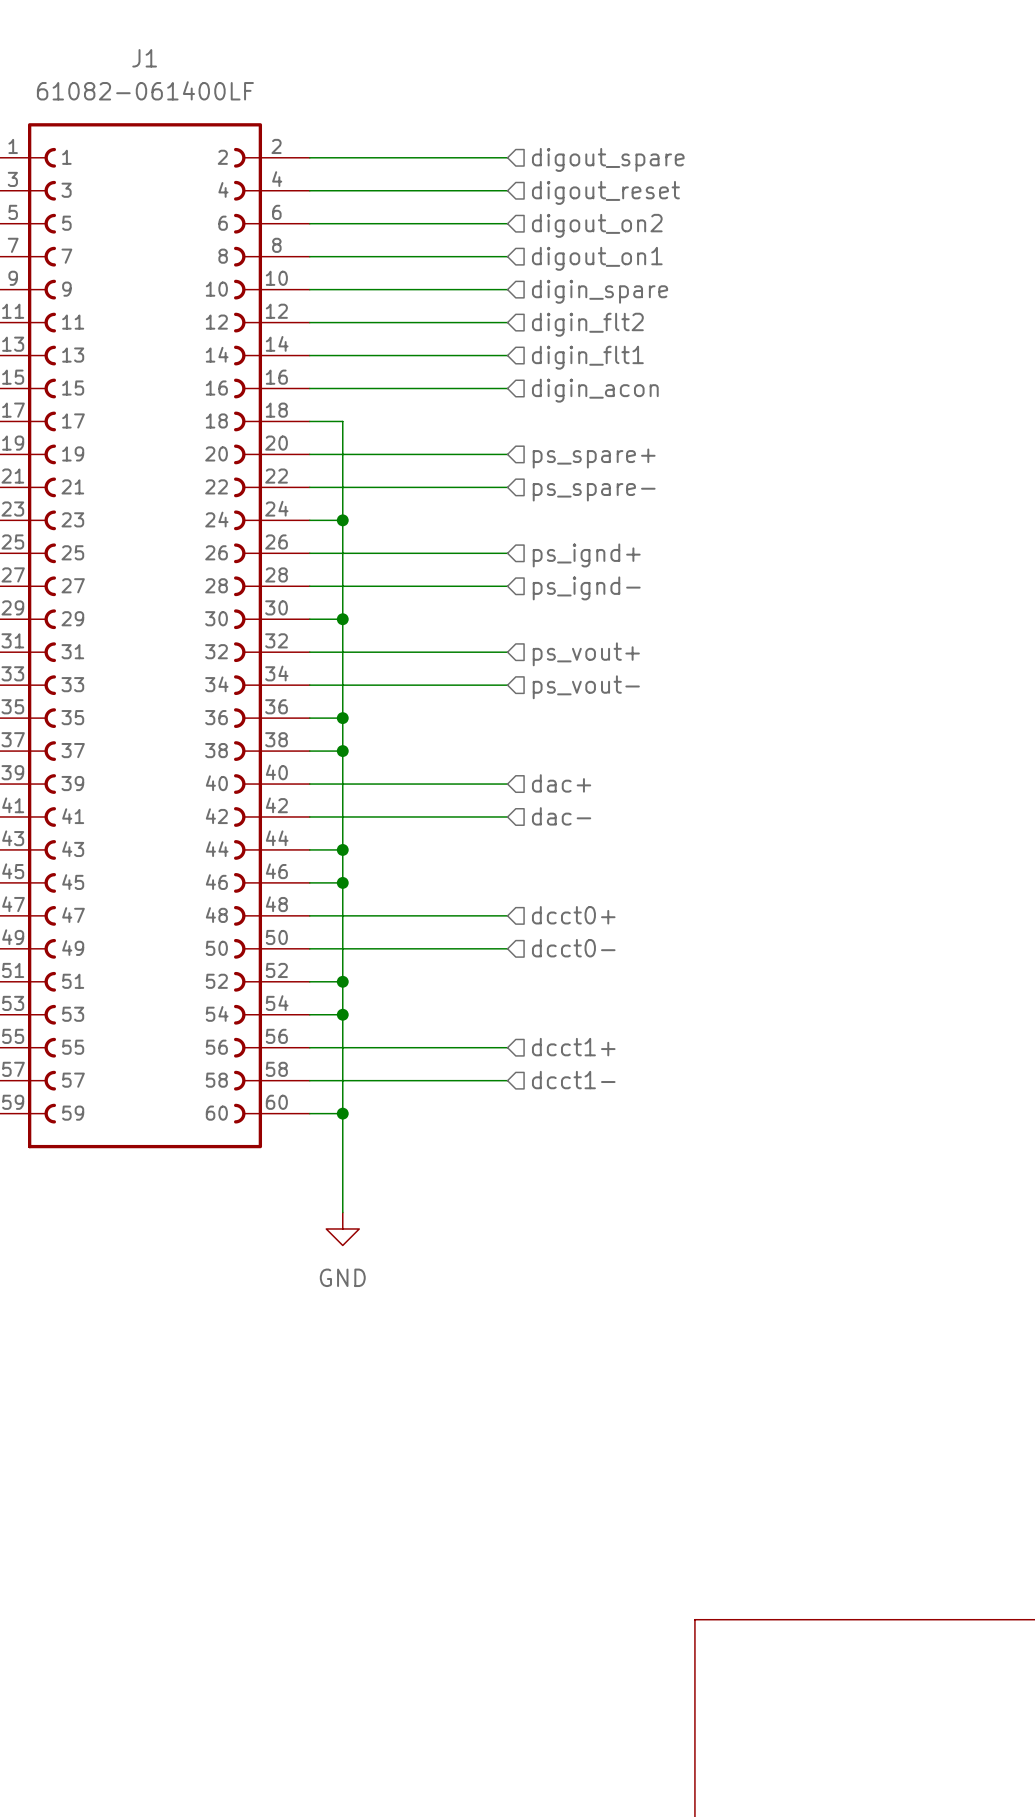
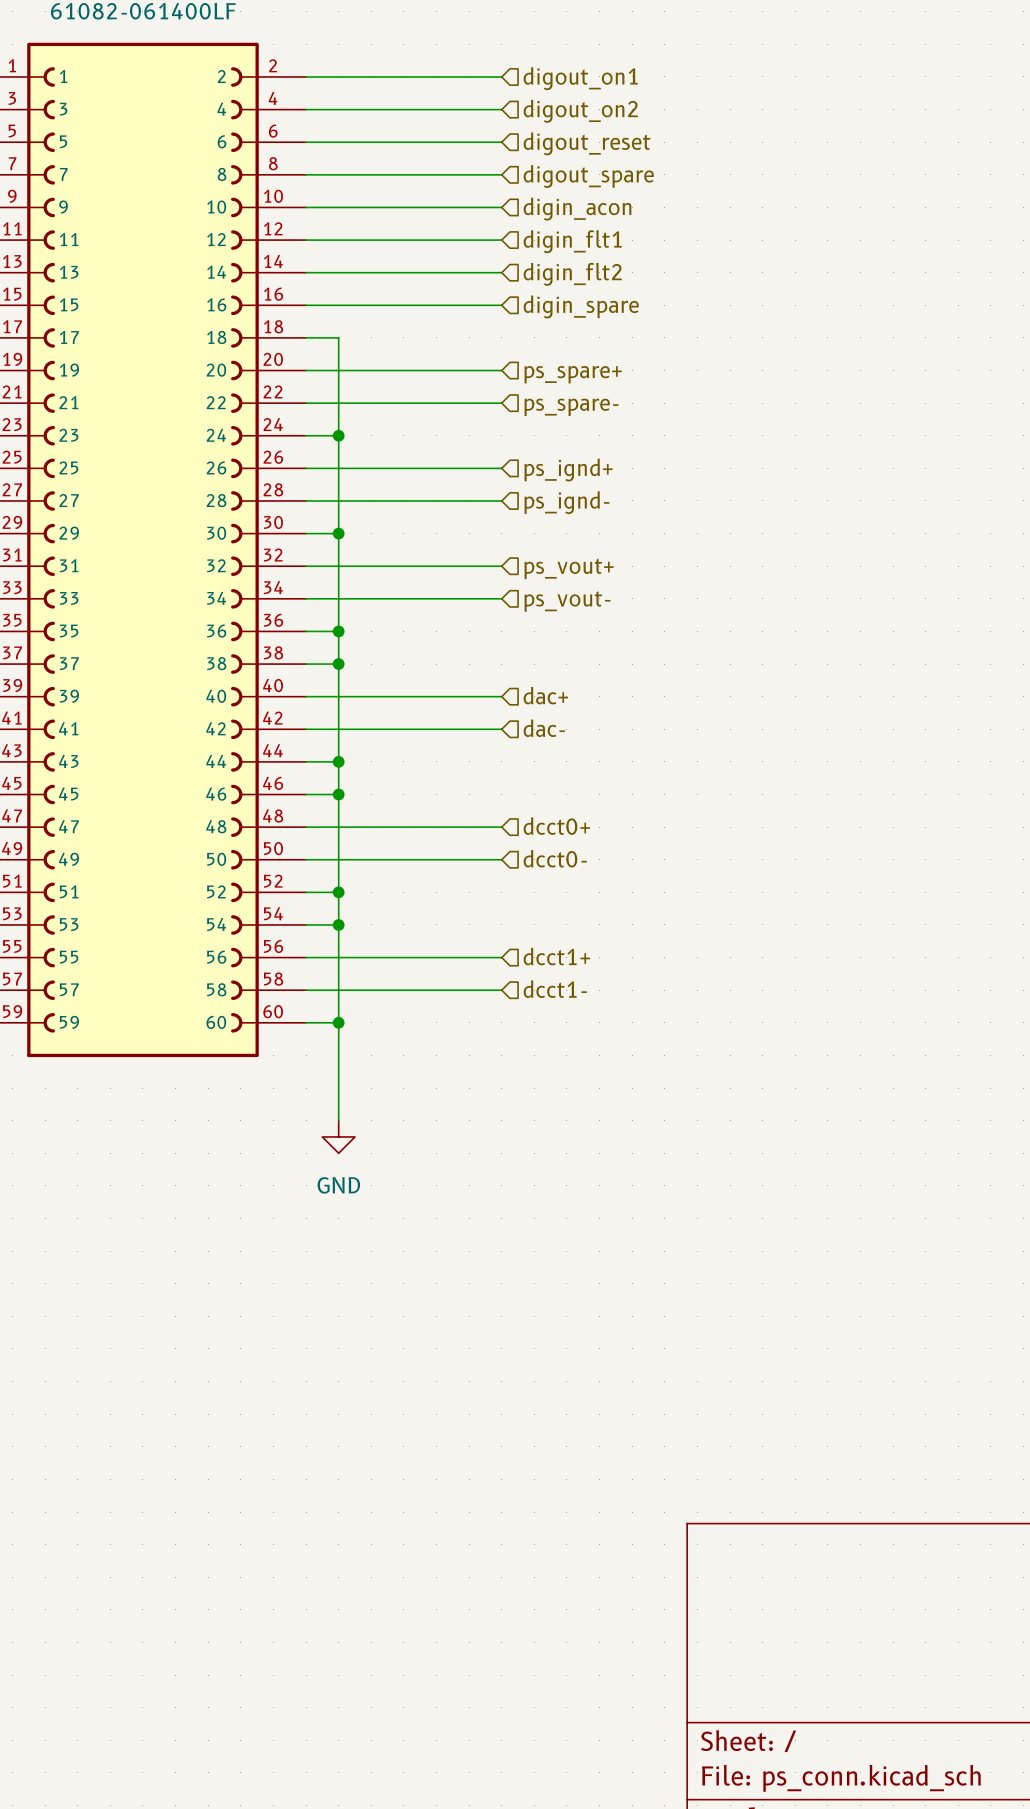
hierarchical label: digout_spare (608, 159) -> digout_on1 (580, 78)
hierarchical label: digout_reset (605, 192) -> digout_on2 (580, 111)
hierarchical label: digout_on2 (597, 225) -> digout_reset (587, 143)
hierarchical label: digout_on1 (597, 258) -> digout_spare (588, 176)
hierarchical label: digin_spare (600, 291) -> digin_acon (577, 209)
hierarchical label: digin_flt2 (587, 324) -> digin_flt1 (572, 241)
hierarchical label: digin_flt1 (587, 357) -> digin_flt2 (572, 274)
hierarchical label: digin_acon (595, 390) -> digin_spare (581, 306)

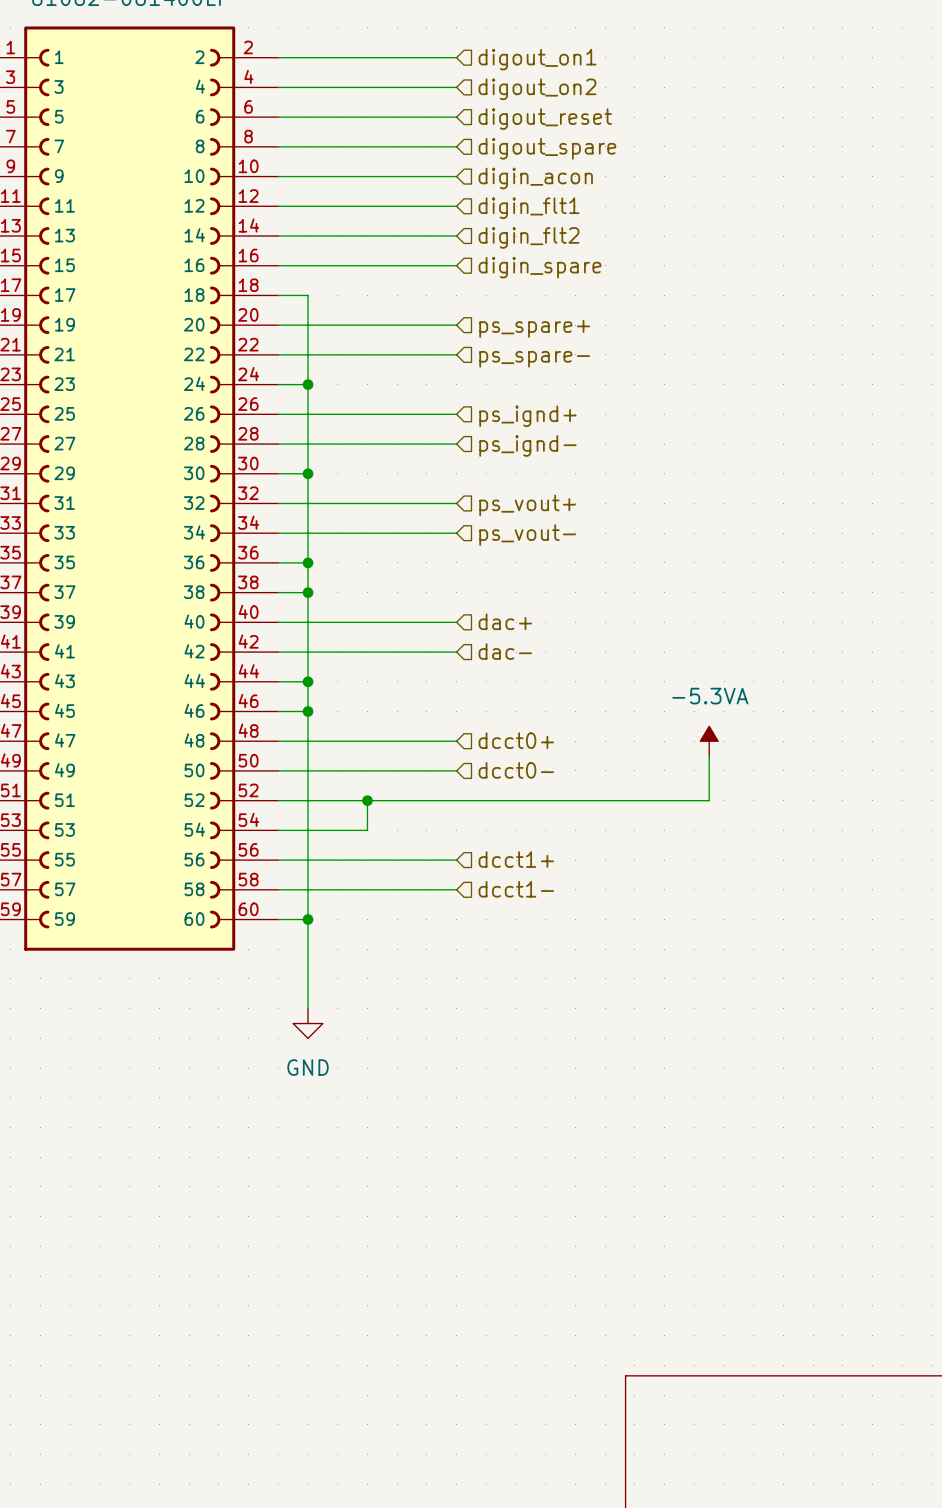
power symbol: none -> -5.3VA (709, 741)
wire: none -> (709, 756) (709, 800) (308, 800)
junction: (338, 892) -> none
wire: none -> (367, 800) (367, 830) (308, 830)
junction: none -> (367, 800)
junction: (338, 924) -> none

